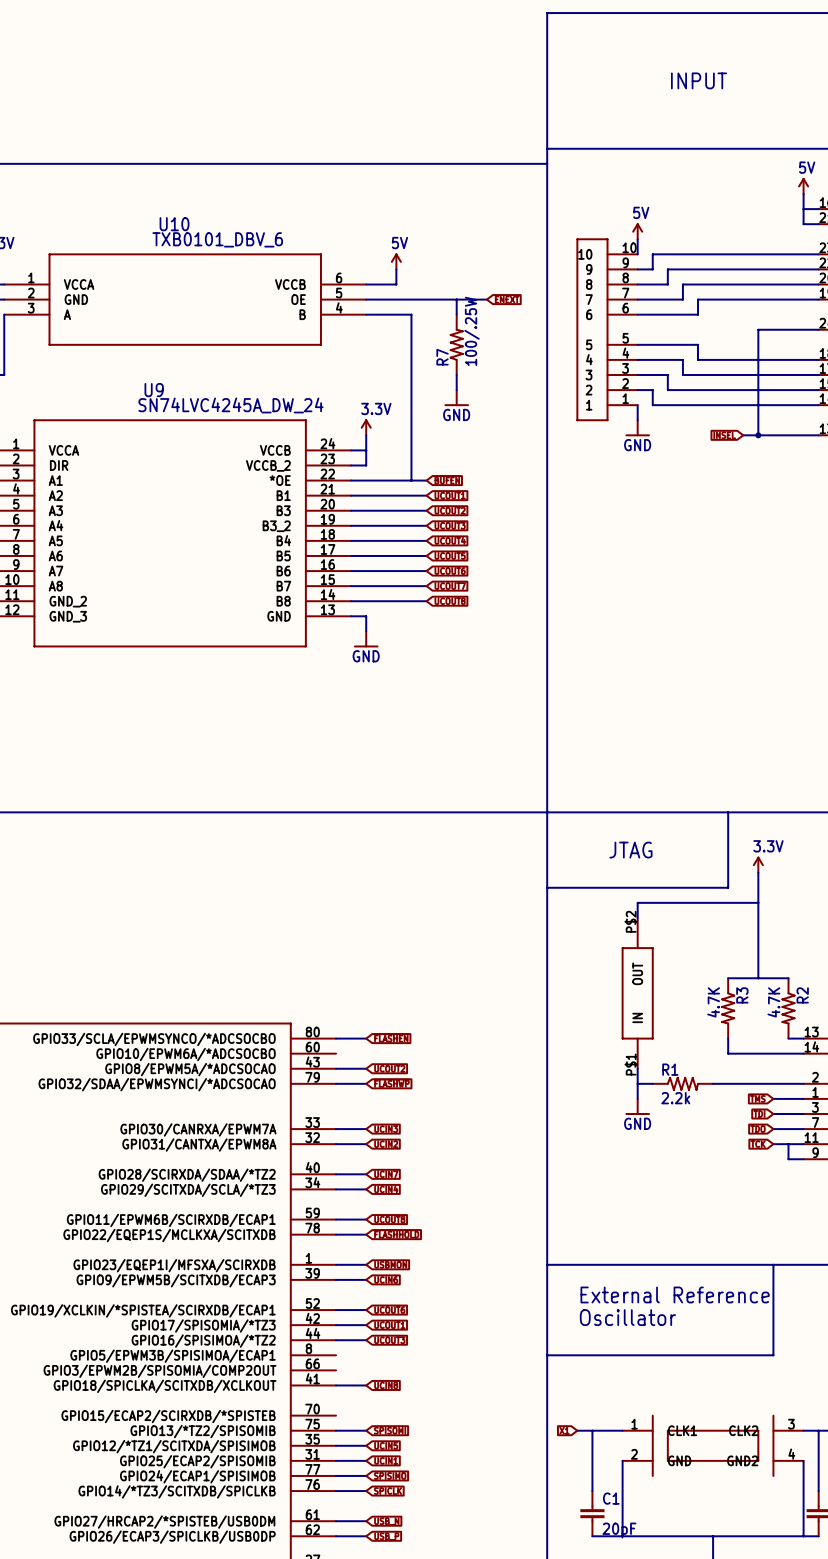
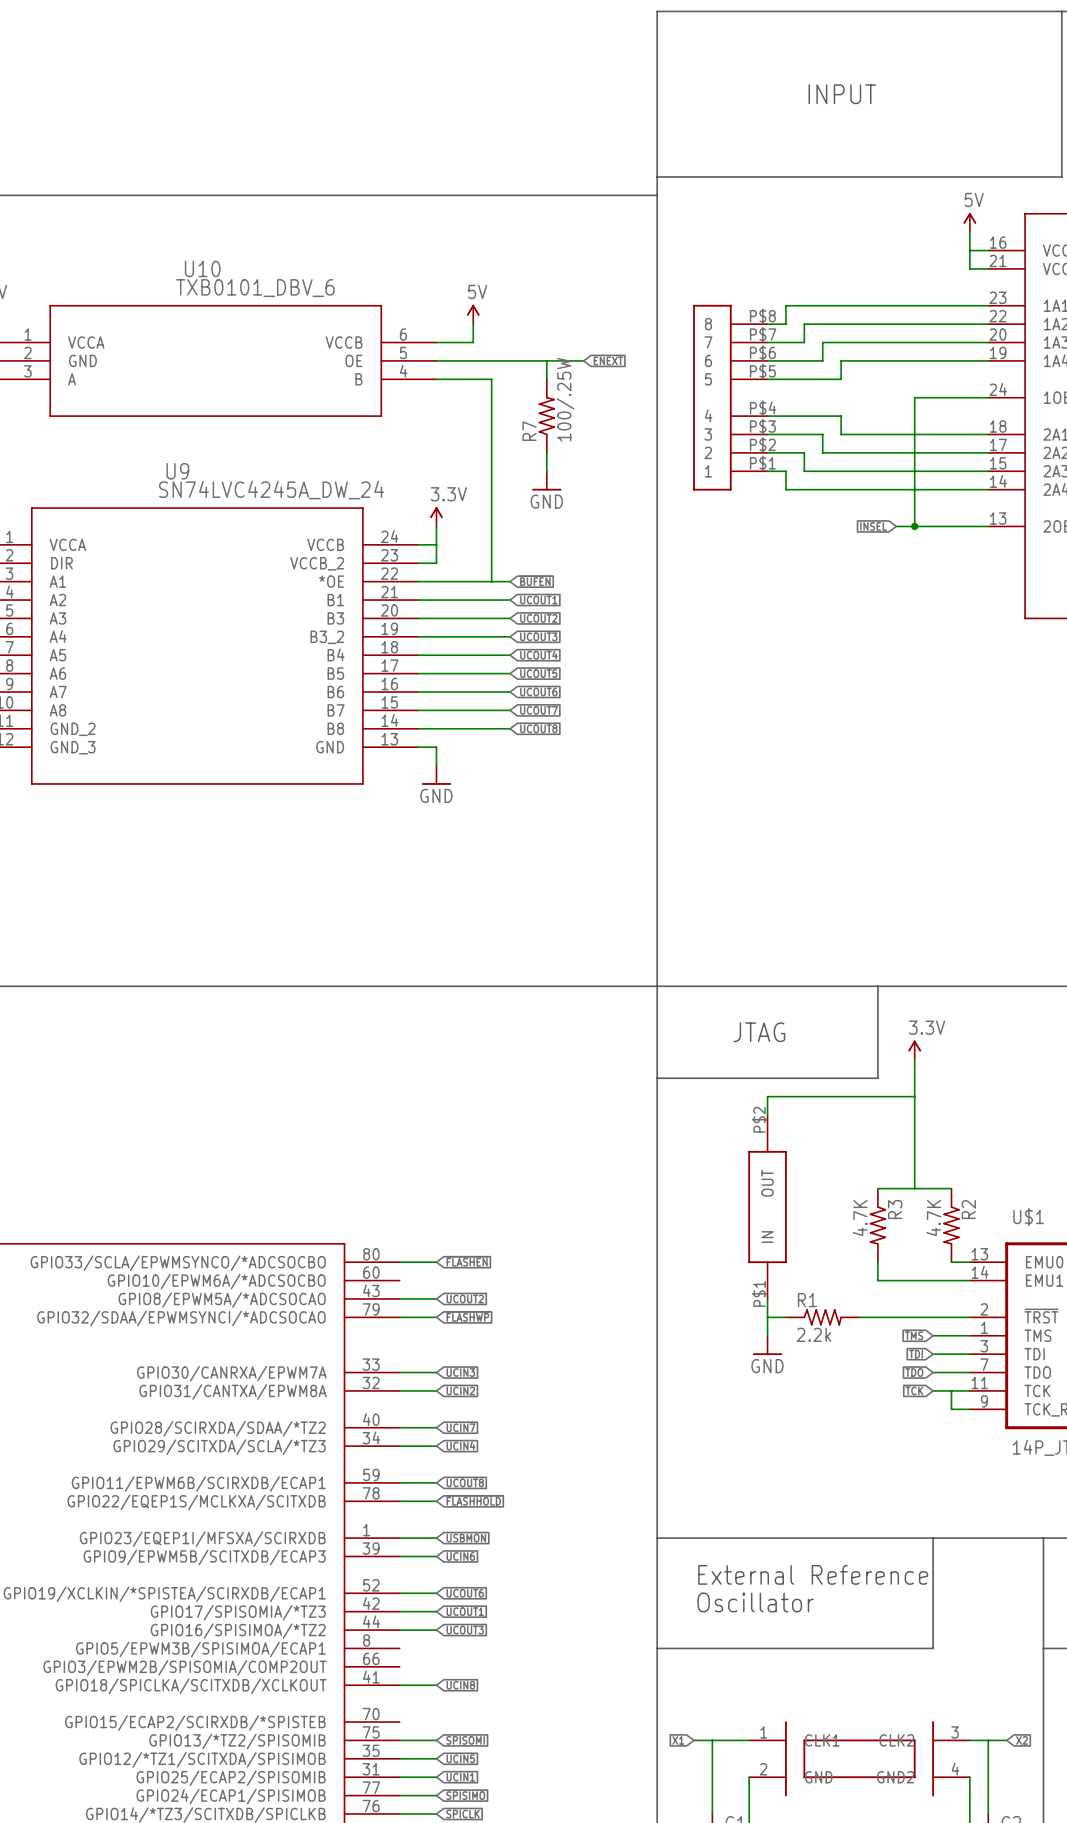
power symbol: 5V (637, 231) -> none
part symbol: [576, 238, 638, 421] -> [693, 304, 768, 491]
wire: (637, 239) (637, 254) -> none
wire: (637, 405) (637, 420) -> none
power symbol: GND (637, 428) -> none

